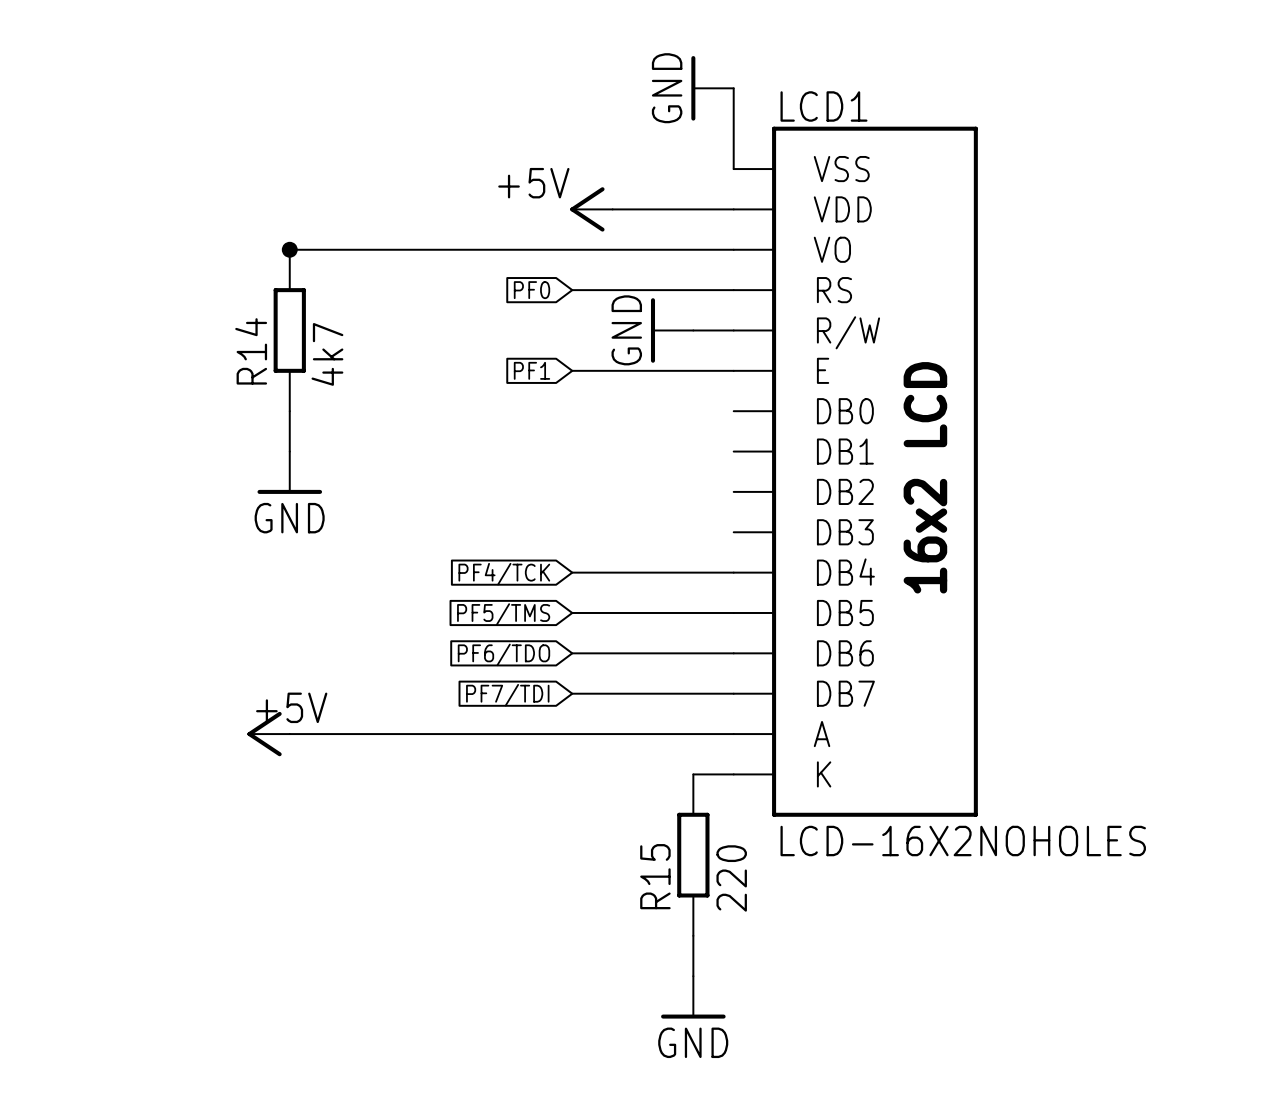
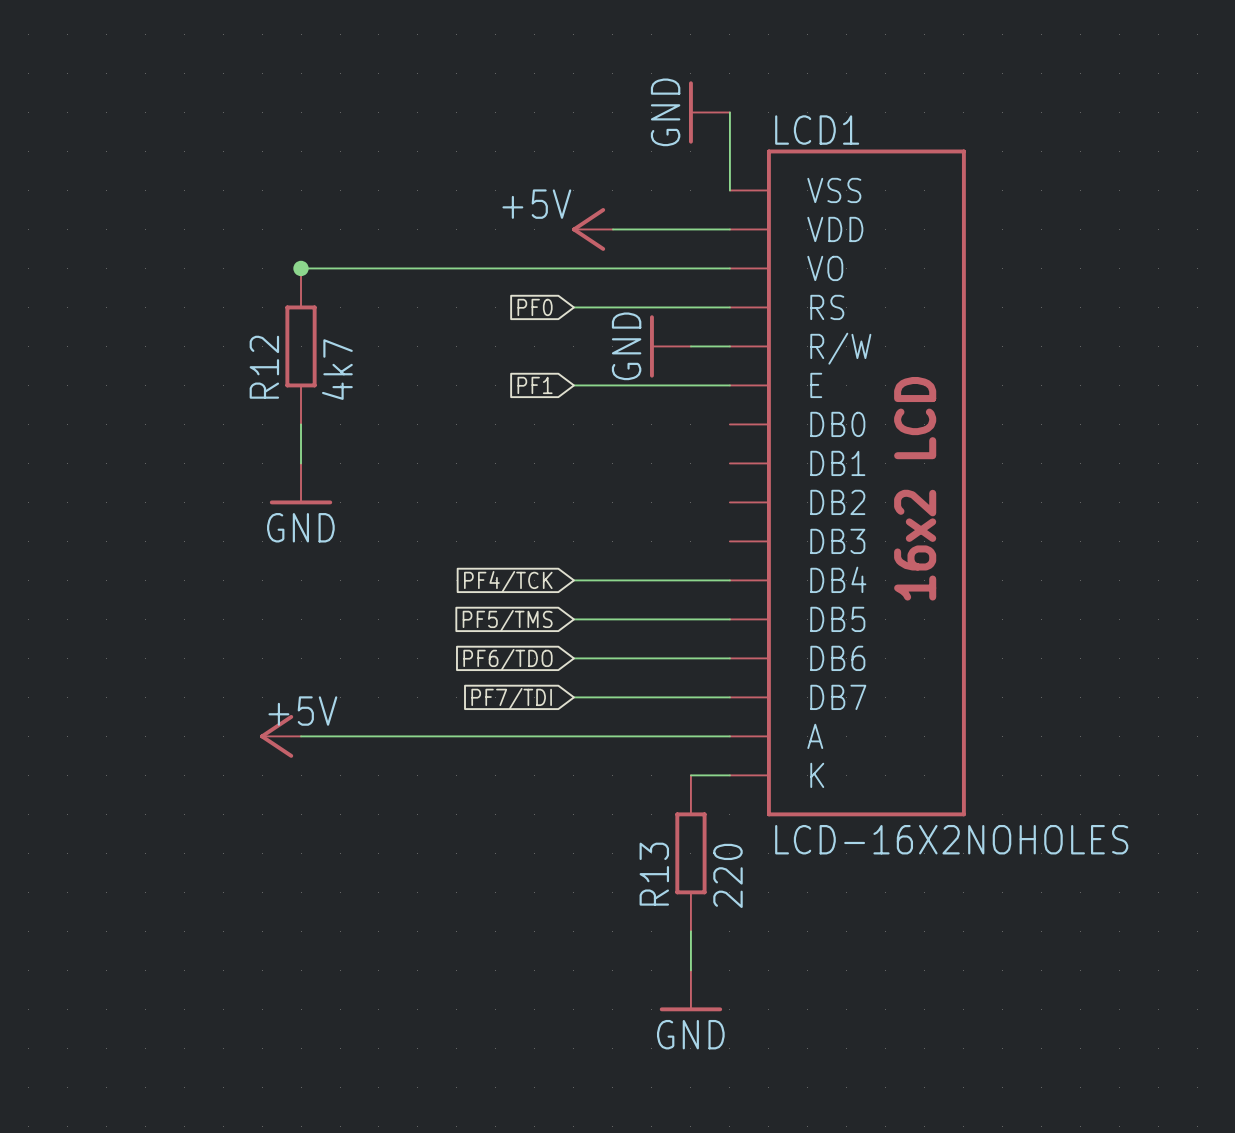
R14 name: R14 (251, 351) -> R12 (264, 367)
R15 name: R15 (655, 876) -> R13 (654, 874)

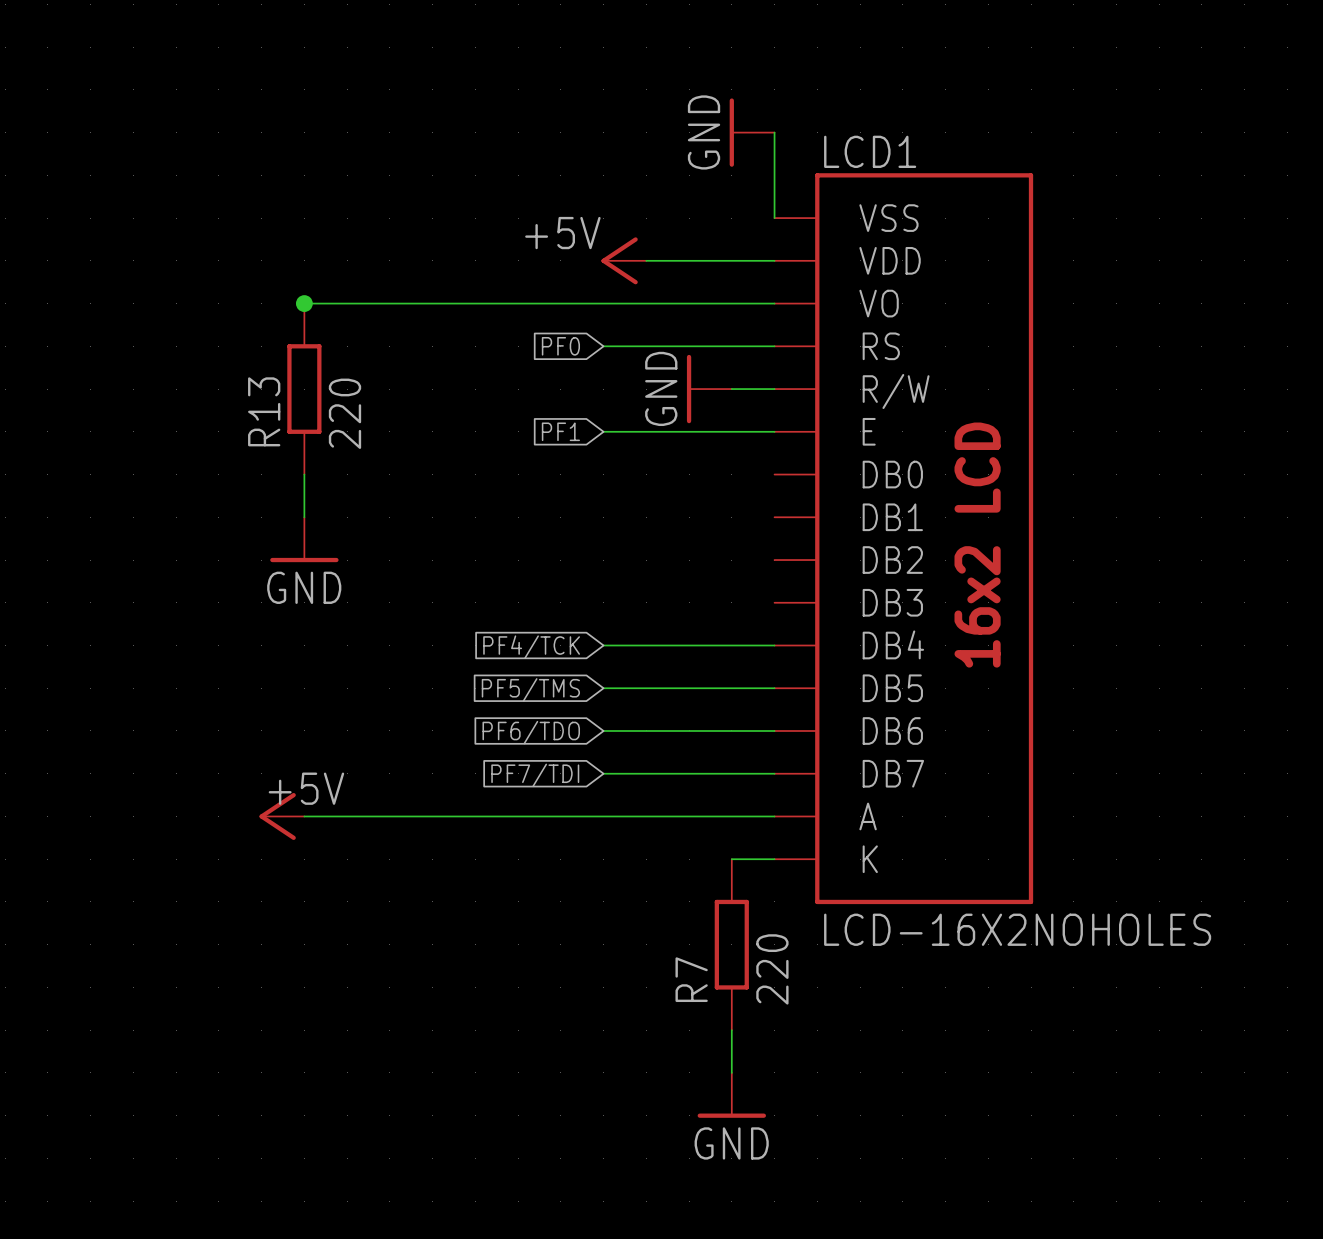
R12 name: R12 (264, 367) -> R13 (264, 411)
R12 value: 4k7 (337, 369) -> 220 (344, 413)
R13 name: R13 (654, 874) -> R7 (691, 979)

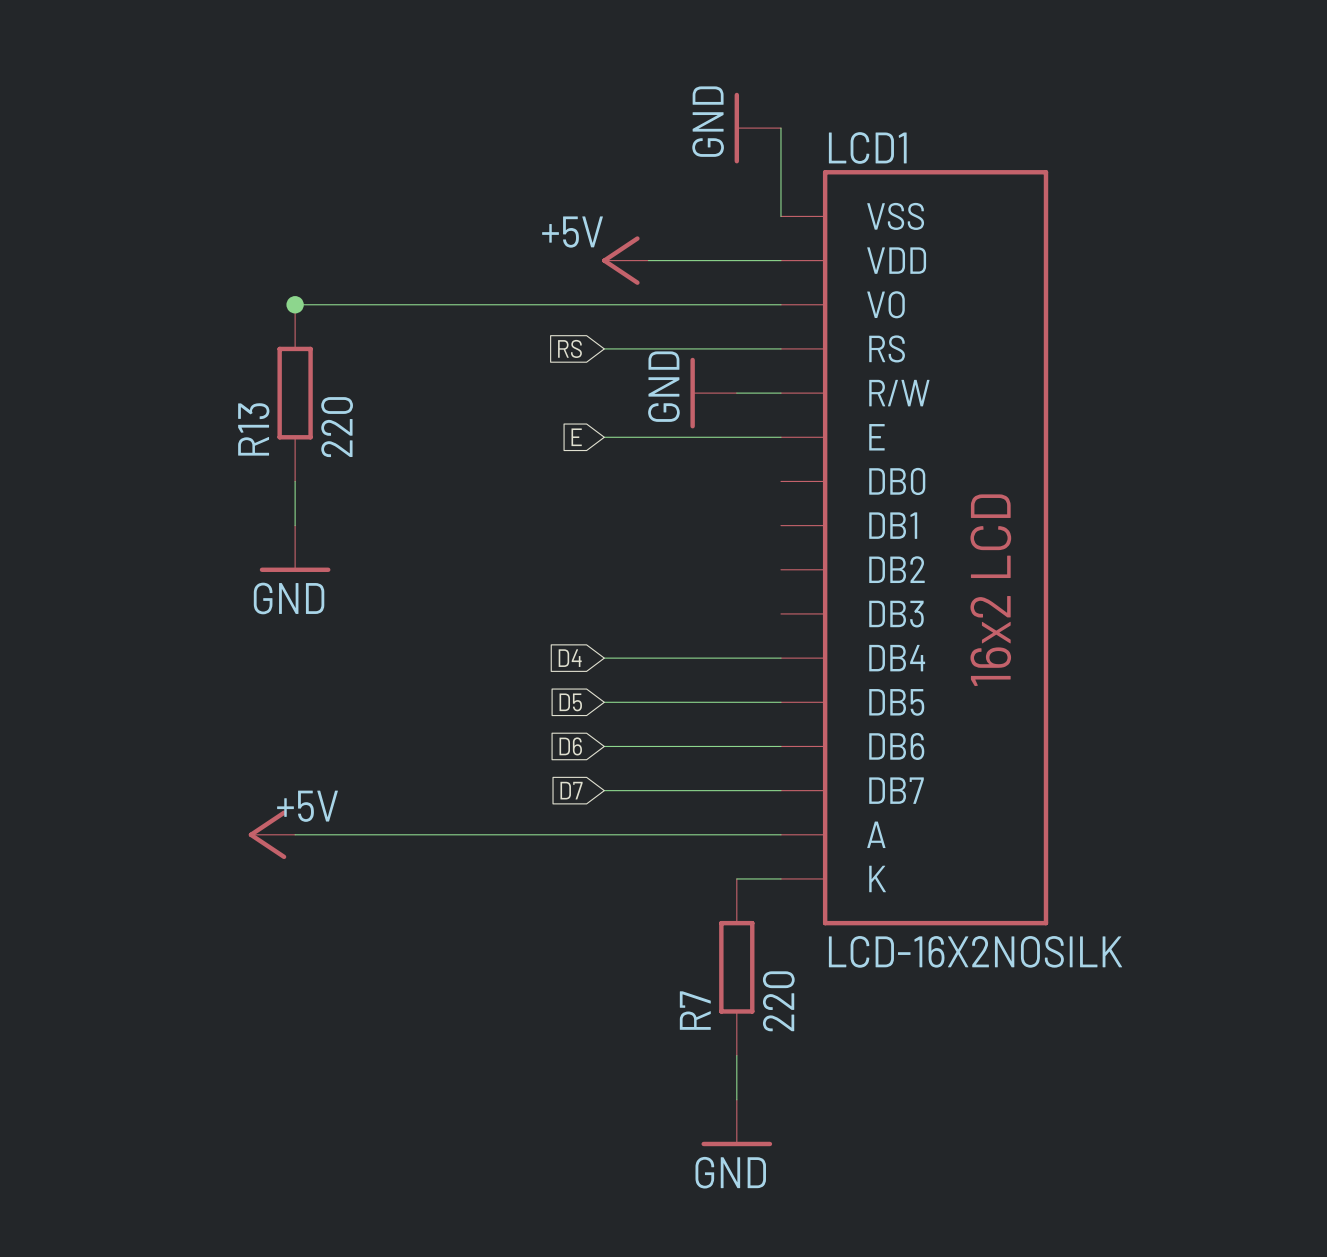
global label: PF0 (560, 346) -> RS (569, 348)
global label: PF1 (560, 431) -> E (576, 437)
global label: PF4/TCK (531, 647) -> D4 (570, 658)
global label: PF5/TMS (530, 689) -> D5 (570, 702)
global label: PF6/TDO (531, 732) -> D6 (570, 746)
global label: PF7/TDI (535, 775) -> D7 (571, 790)
LCD1 value: LCD-16X2NOHOLES (1017, 929) -> LCD-16X2NOSILK (975, 951)

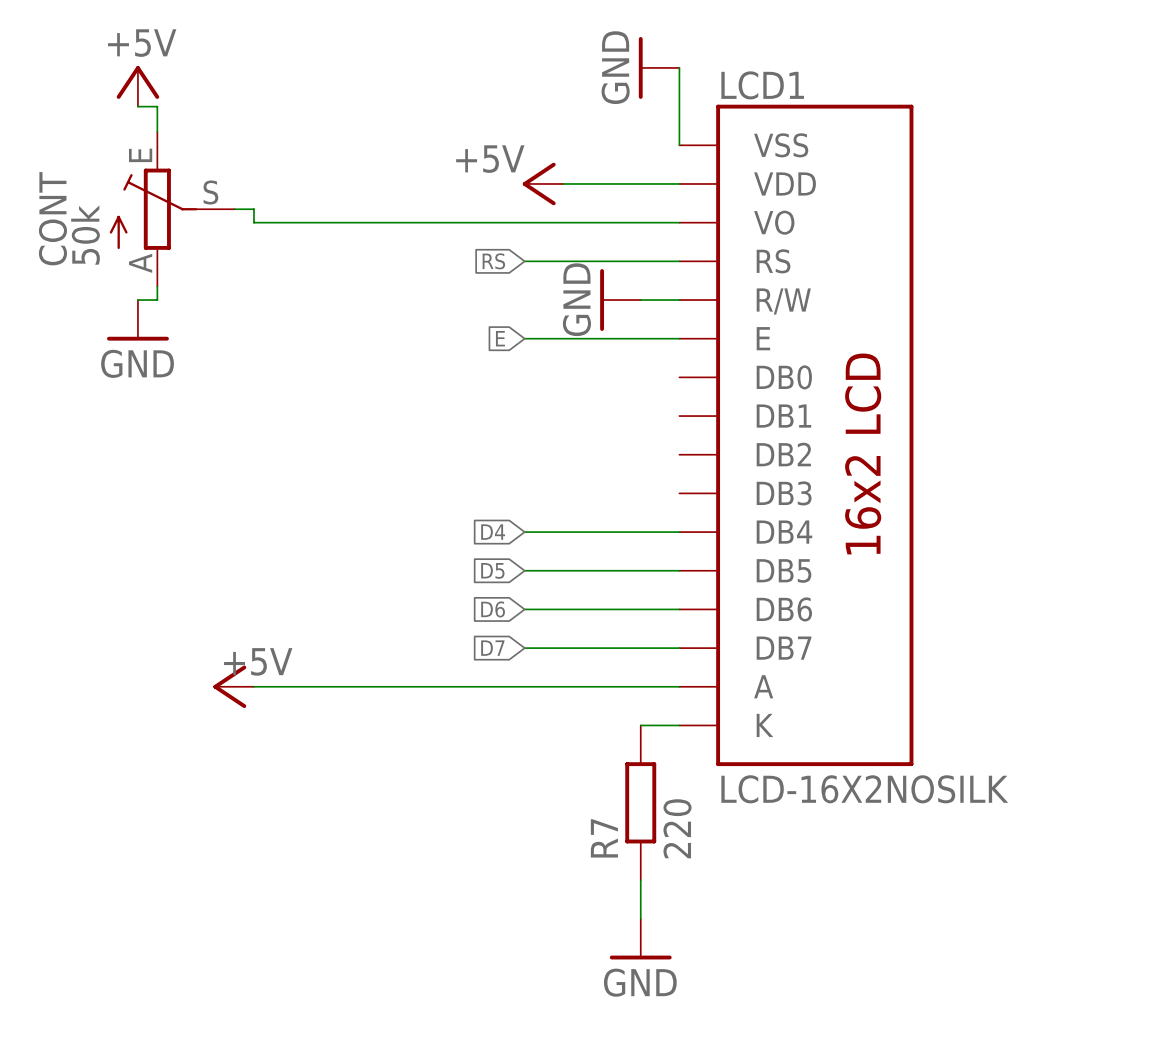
power symbol: none -> +5V (137, 86)
wire: none -> (137, 106) (157, 106) (157, 131)
CONT: none -> 50k (172, 209)
wire: none -> (234, 209) (253, 209) (253, 222)
junction: (295, 304) -> none
wire: none -> (157, 286) (157, 300) (137, 300)
R13: 220 (295, 393) -> none
wire: (295, 481) (295, 525) -> none
power symbol position: GND (295, 548) -> GND (137, 320)

